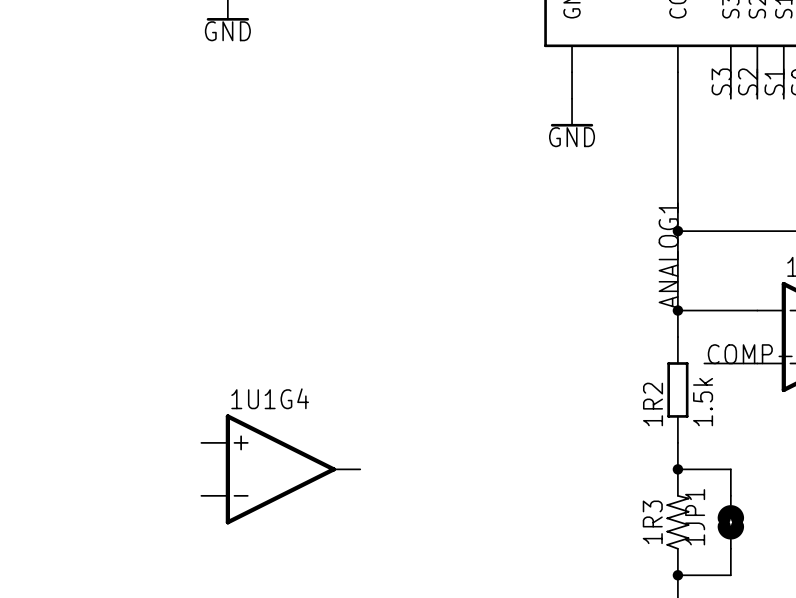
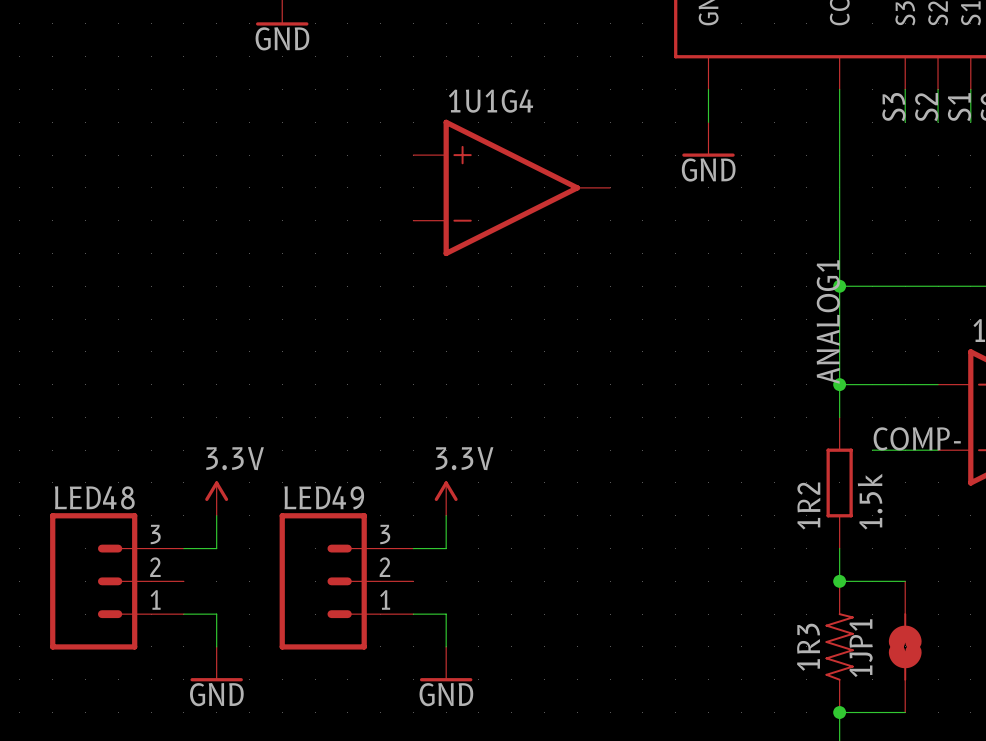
power symbol: none -> 3.3V (216, 498)
power symbol: none -> 3.3V (446, 498)
wire: none -> (216, 515) (216, 548) (183, 548)
wire: none -> (446, 515) (446, 548) (413, 548)
LED48: none -> (116, 581)
LED49: none -> (346, 581)
1U1G4 position: (280, 469) -> (511, 187)
wire: none -> (183, 614) (216, 614) (216, 646)
wire: none -> (413, 614) (446, 614) (446, 646)
power symbol: none -> GND (216, 664)
power symbol: none -> GND (446, 664)

